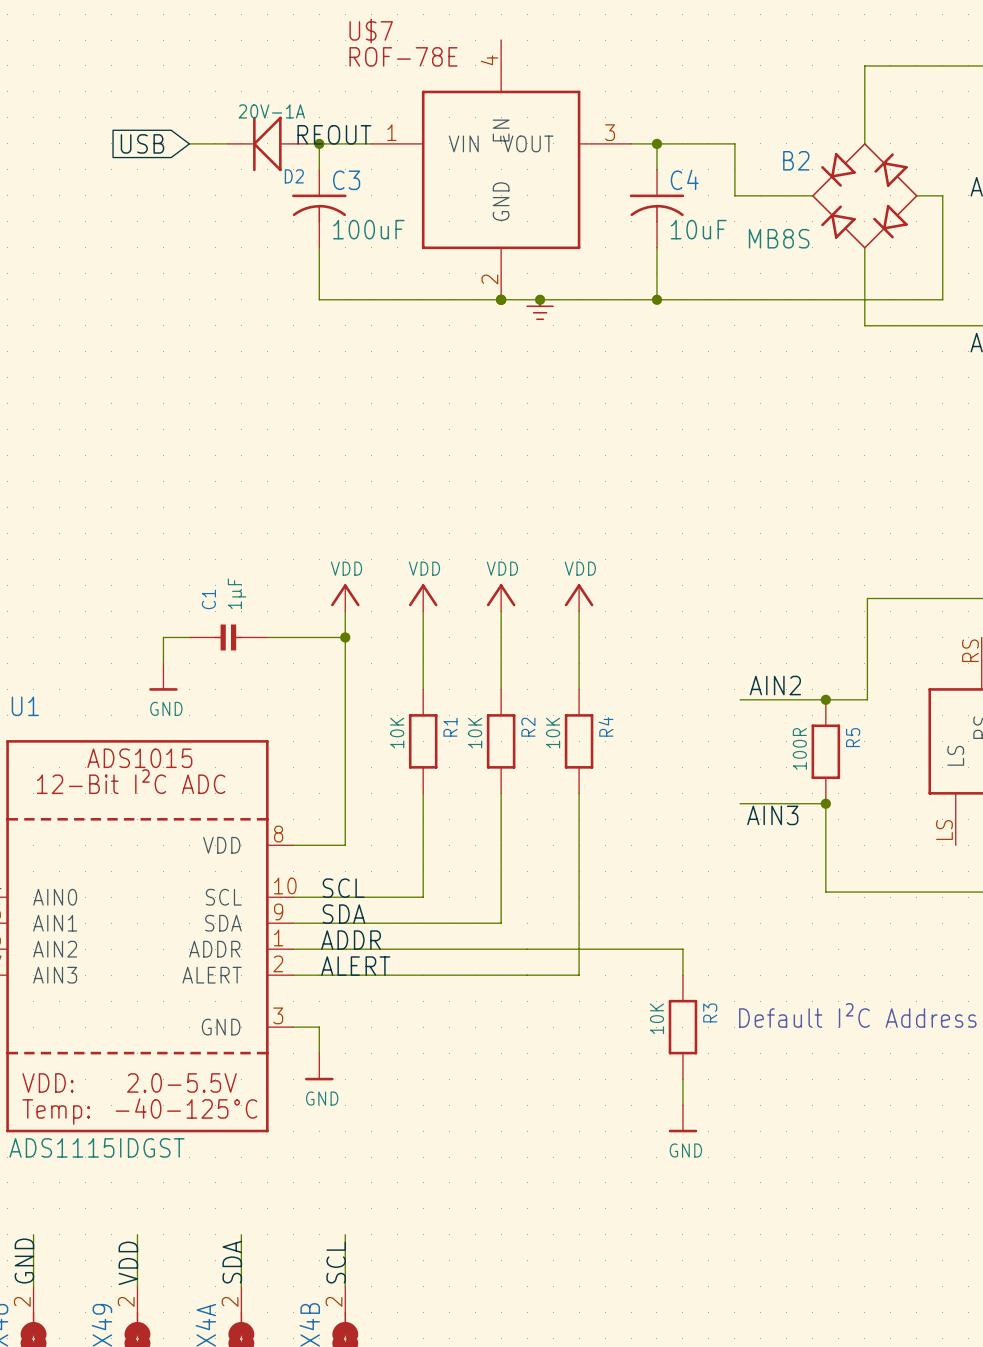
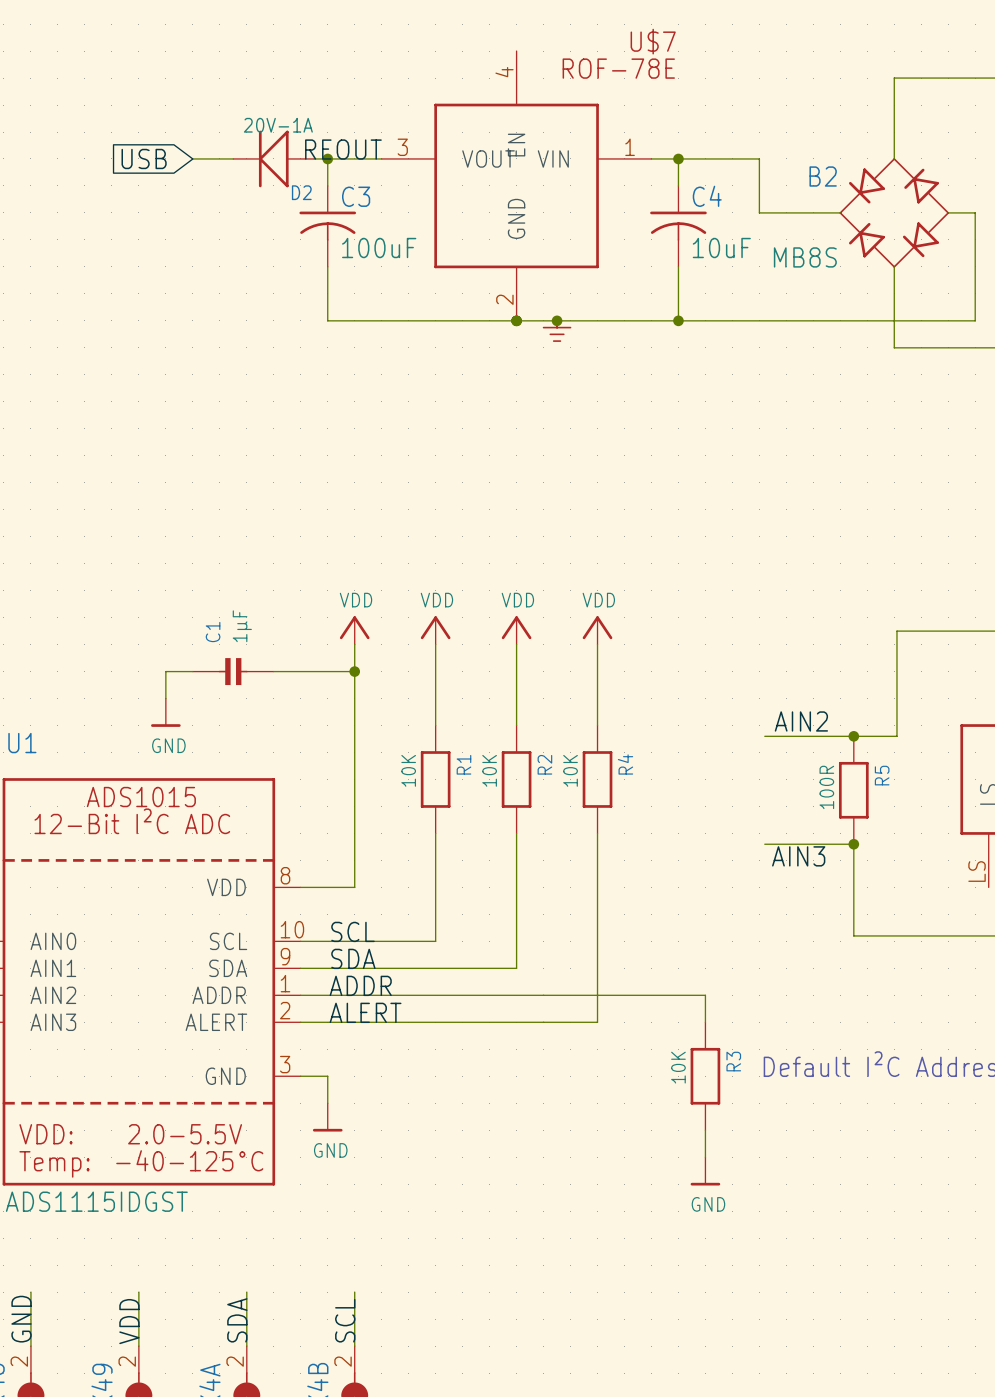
U$7 flip: as is (501, 169) -> left-right (516, 185)

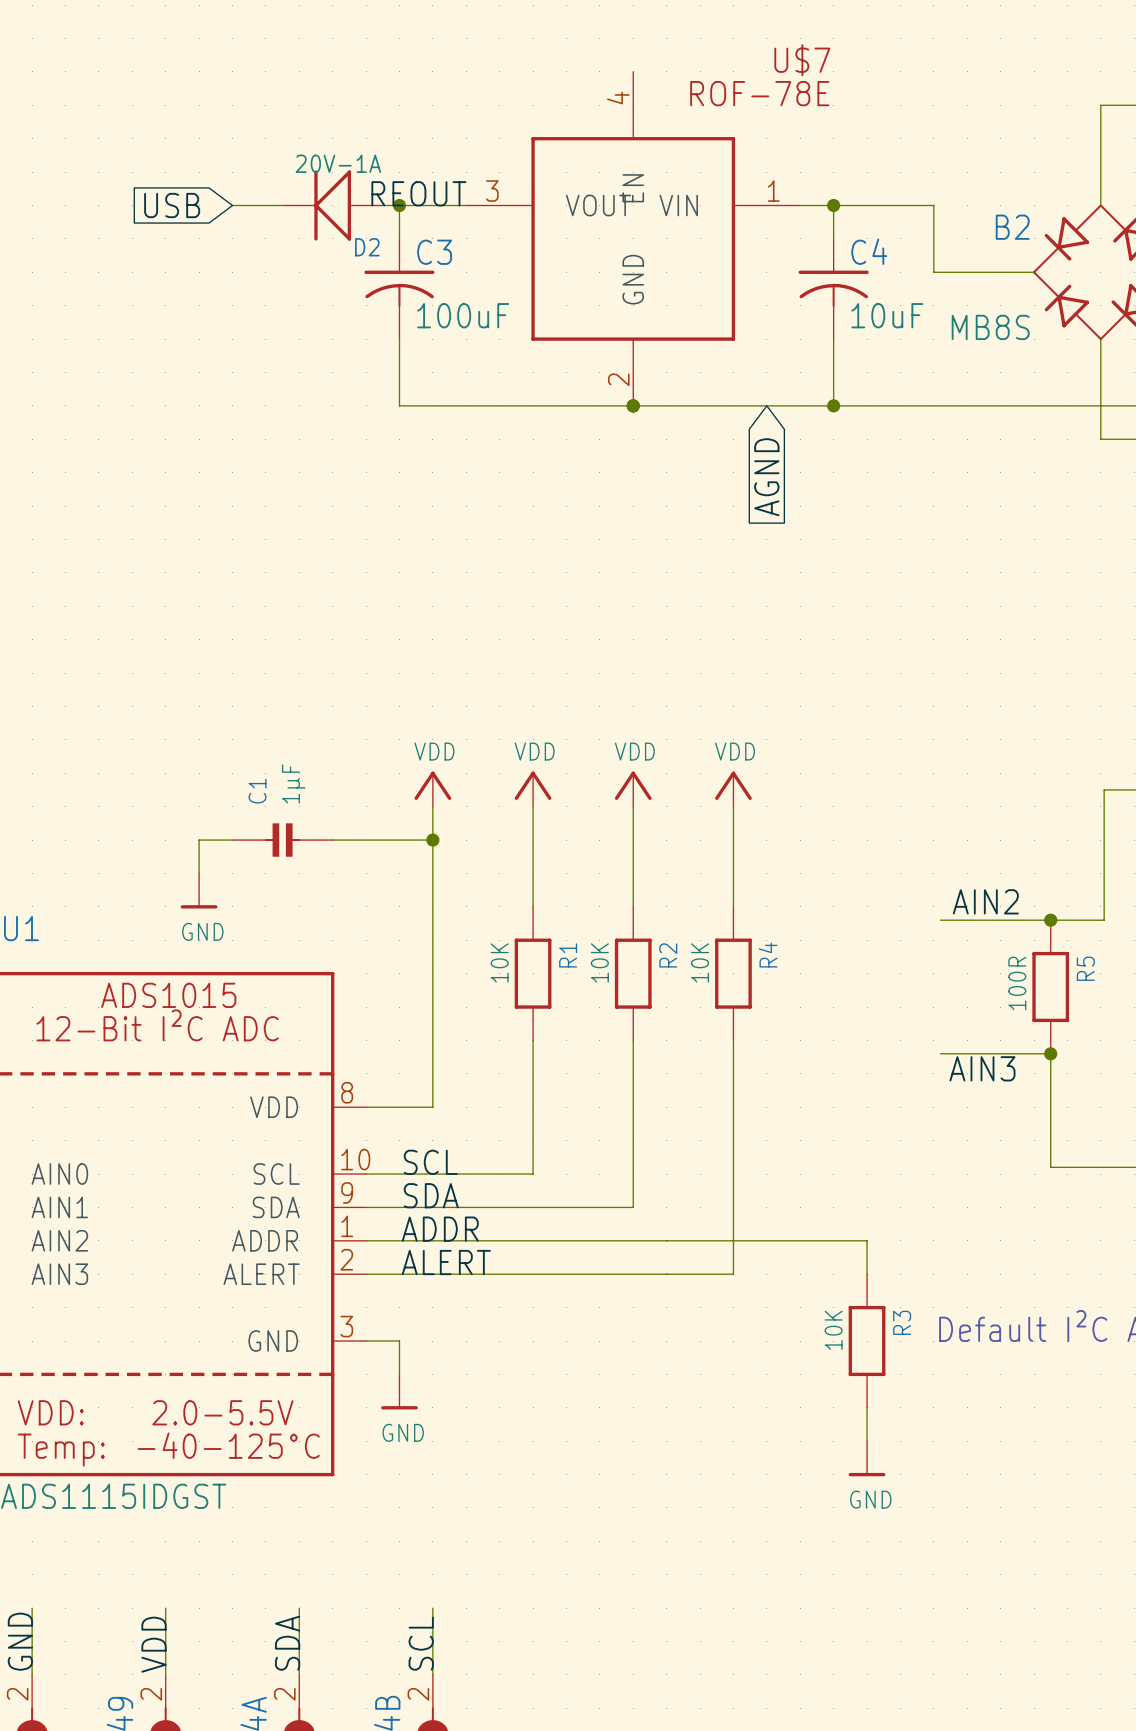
junction: (557, 320) -> none
power symbol: (557, 330) -> none
global label: none -> AGND (766, 477)

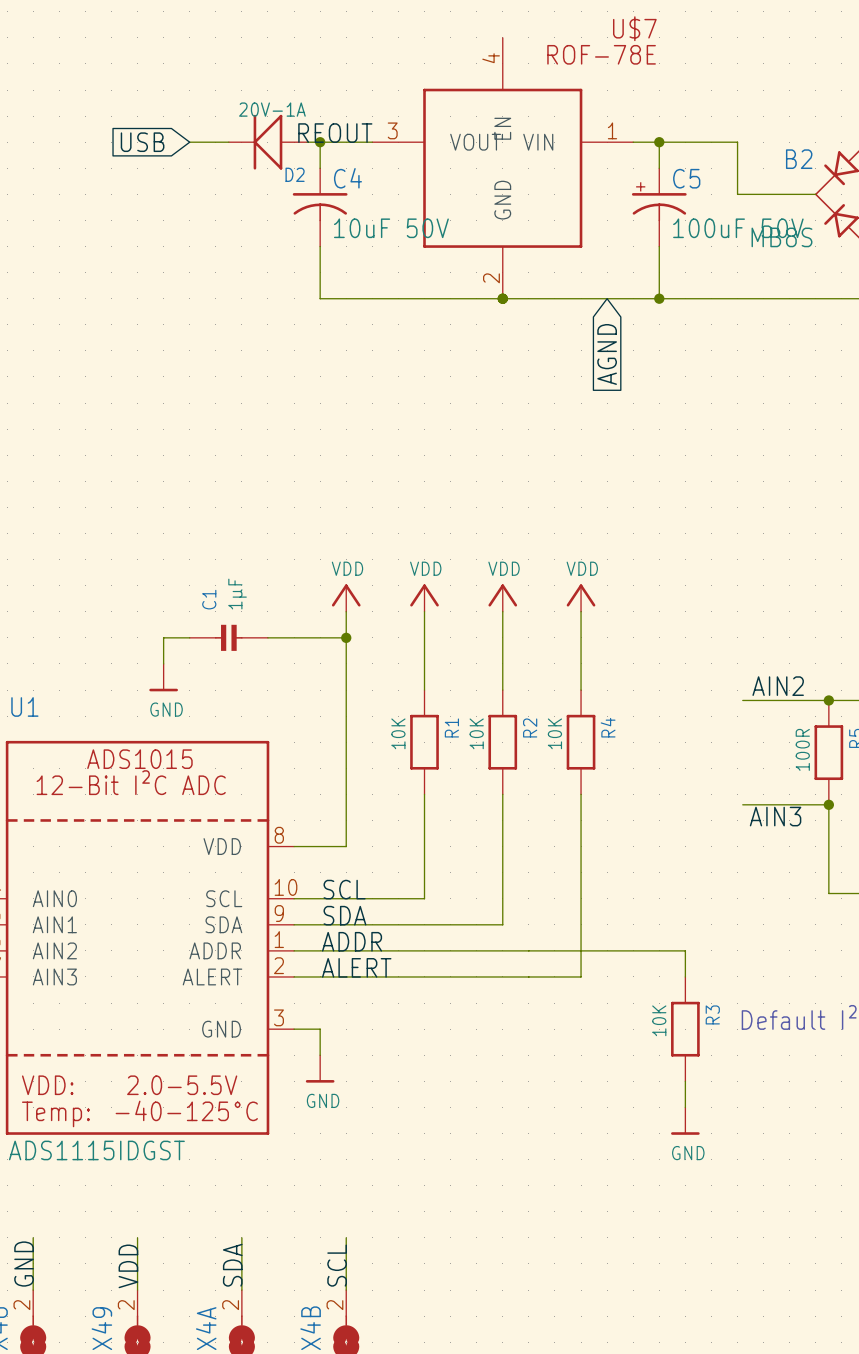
C3 name: C3 (434, 252) -> C4 (347, 178)
C4: 10uF (833, 288) -> none
C5: none -> 100uF 50V (659, 207)
C3 value: 100uF (463, 315) -> 10uF 50V (391, 228)

